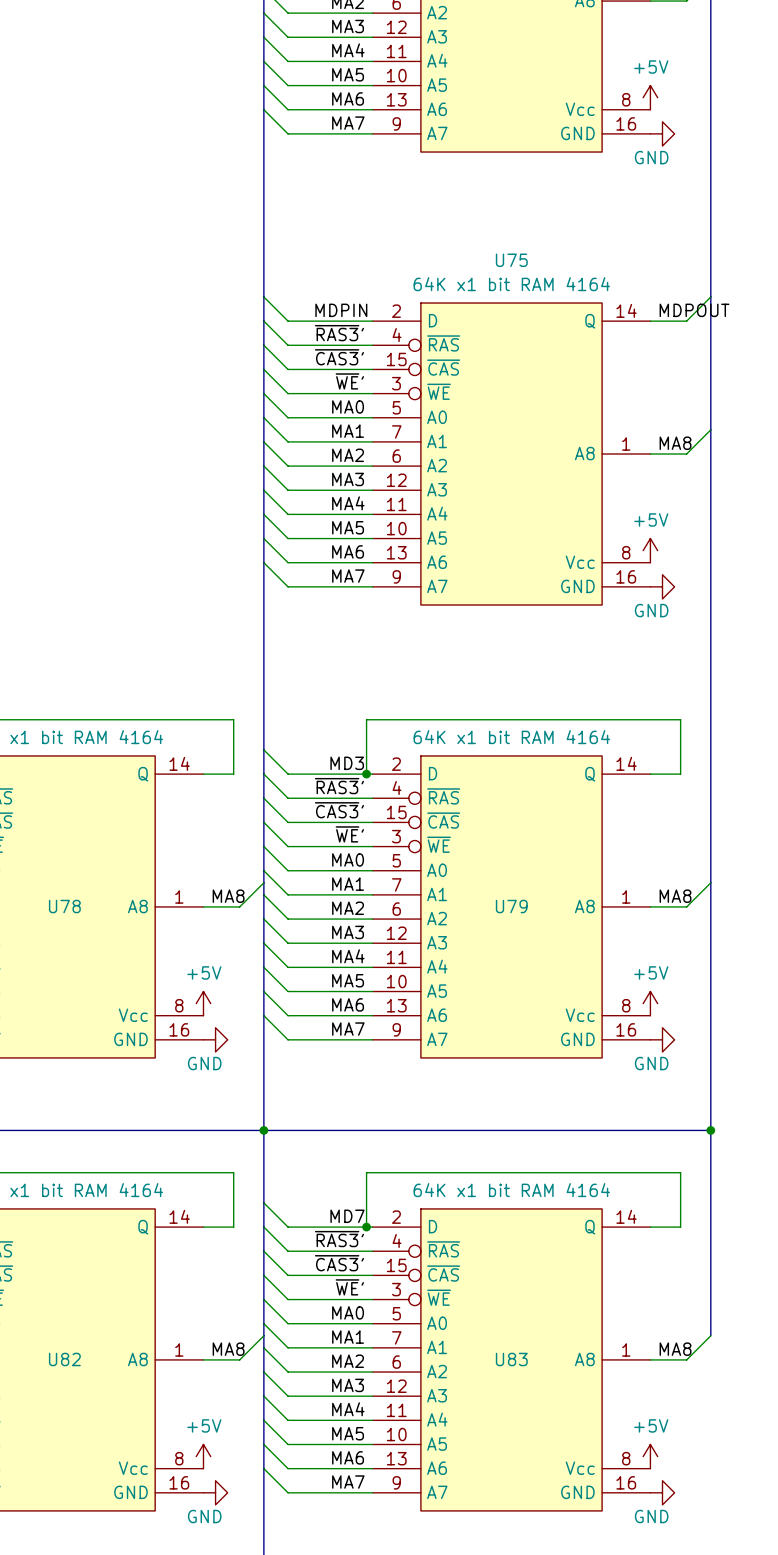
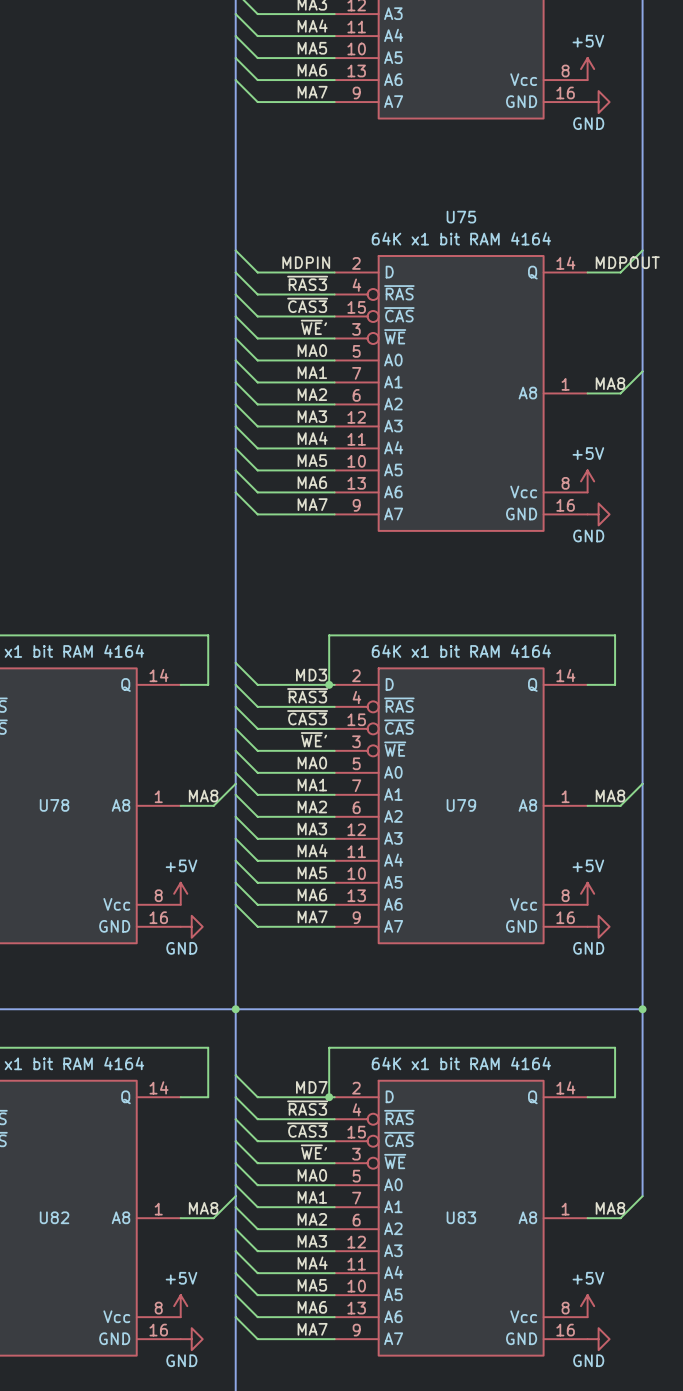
label: ~{RAS3}' (339, 333) -> ~{RAS3} (307, 283)
label: ~{CAS3}' (339, 357) -> ~{CAS3} (307, 305)
label: ~{RAS3}' (339, 786) -> ~{RAS3} (307, 695)
label: ~{CAS3}' (339, 810) -> ~{CAS3} (307, 717)
label: ~{RAS3}' (339, 1239) -> ~{RAS3} (307, 1108)
label: ~{CAS3}' (339, 1263) -> ~{CAS3} (307, 1130)

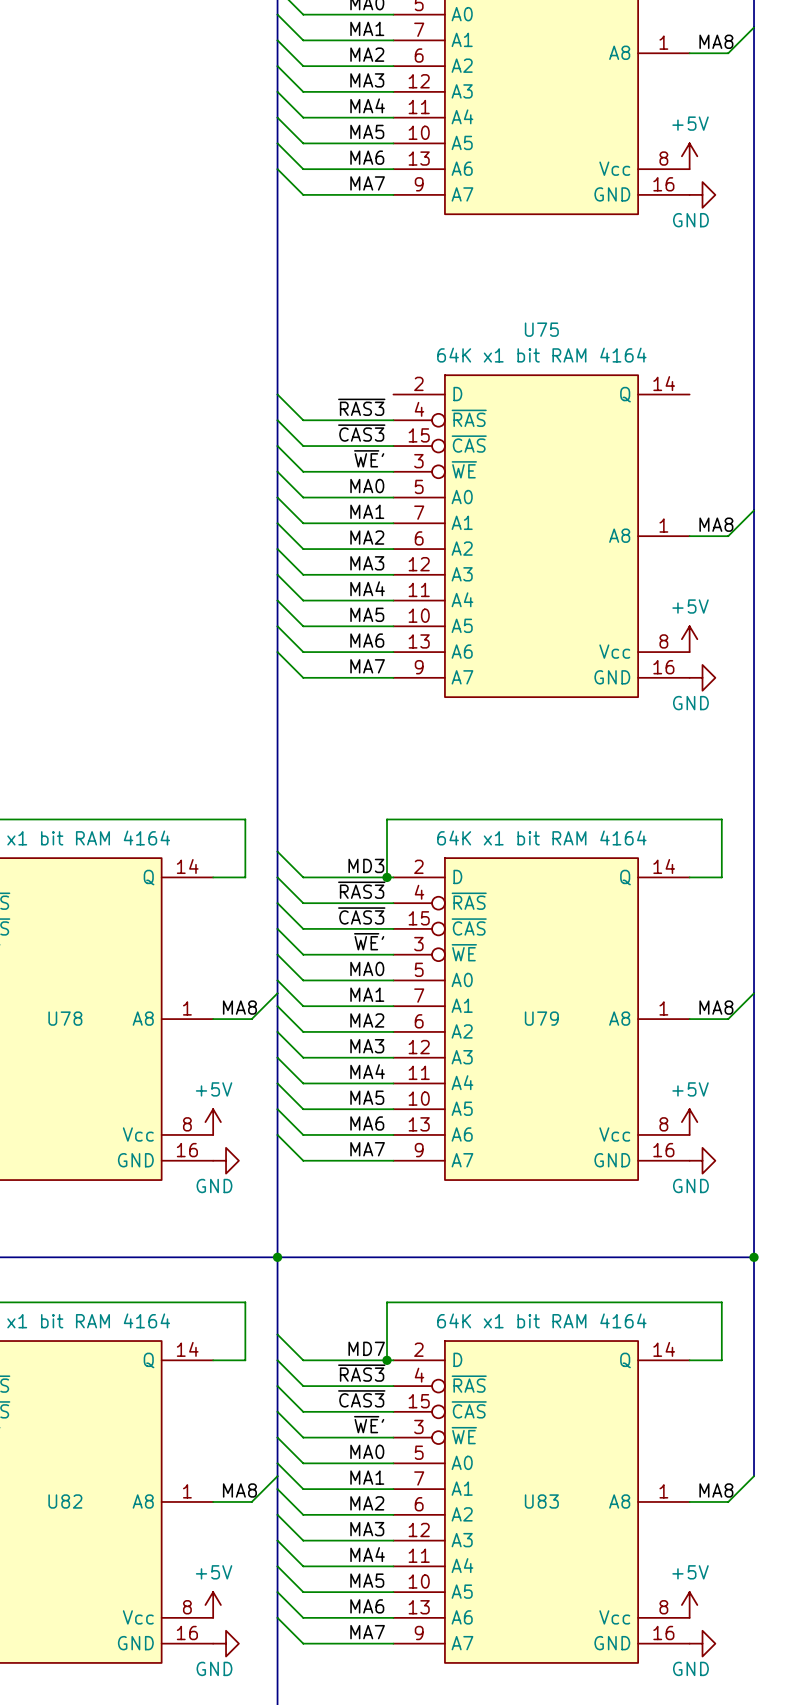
wire: (235, 250) (257, 272) -> none
wire: (642, 250) (620, 272) (587, 272) -> none
label: MDPIN (306, 262) -> none
label: MDPOUT (627, 262) -> none
wire: (257, 272) (334, 272) -> none

